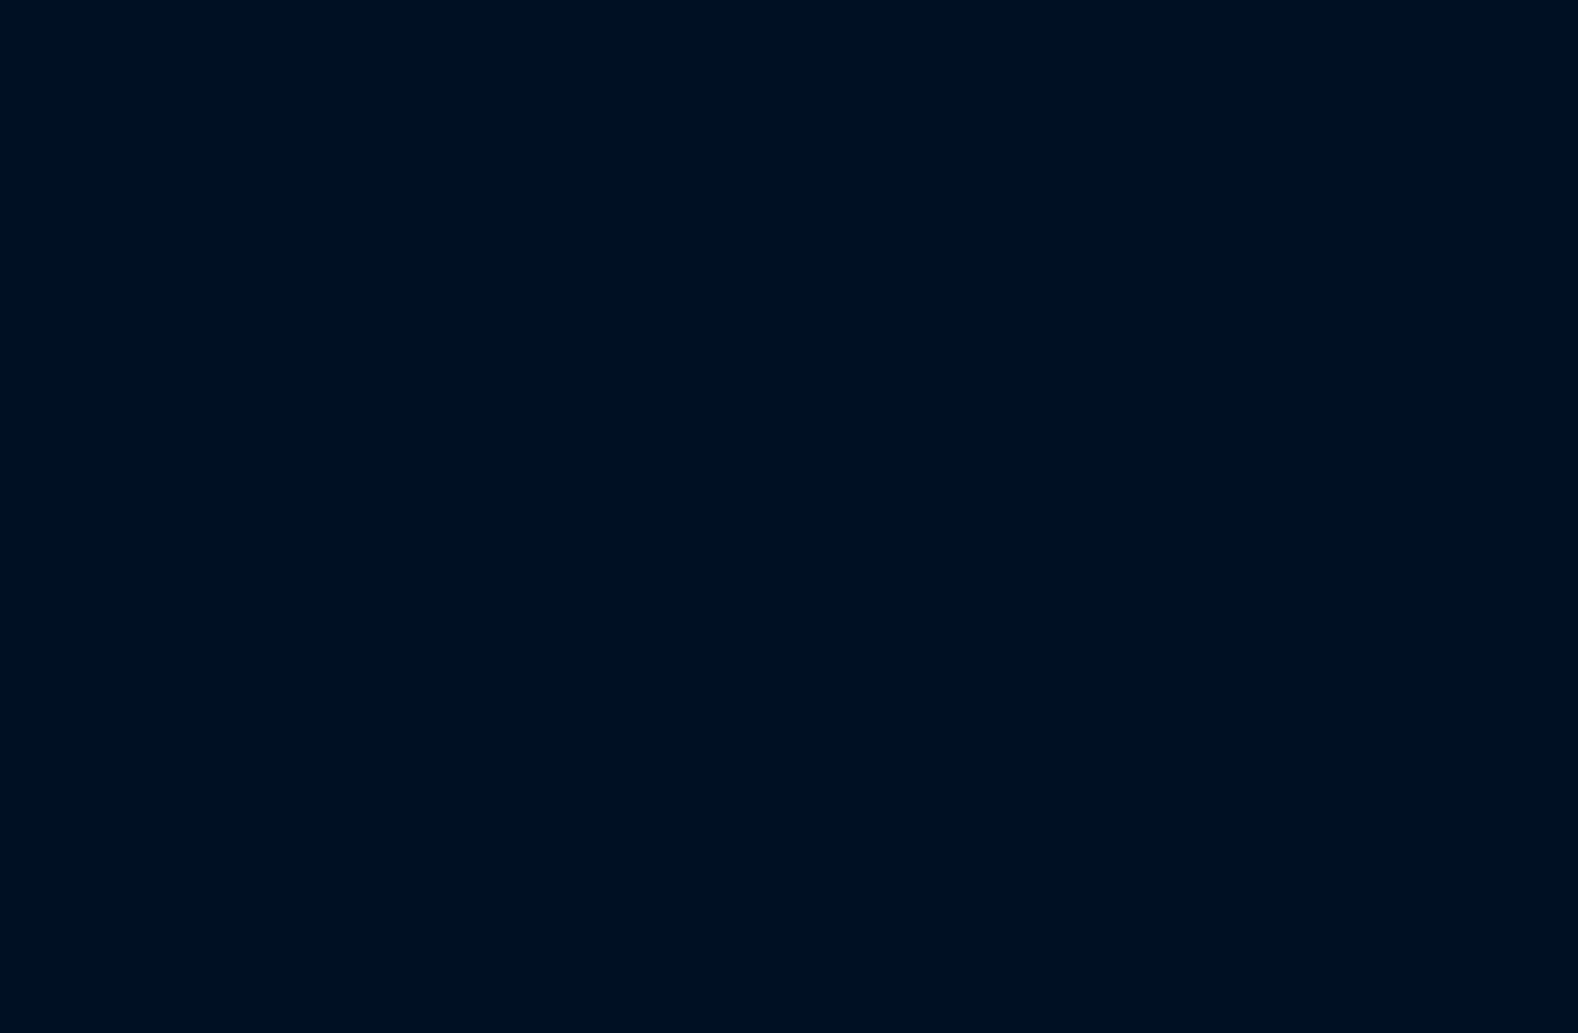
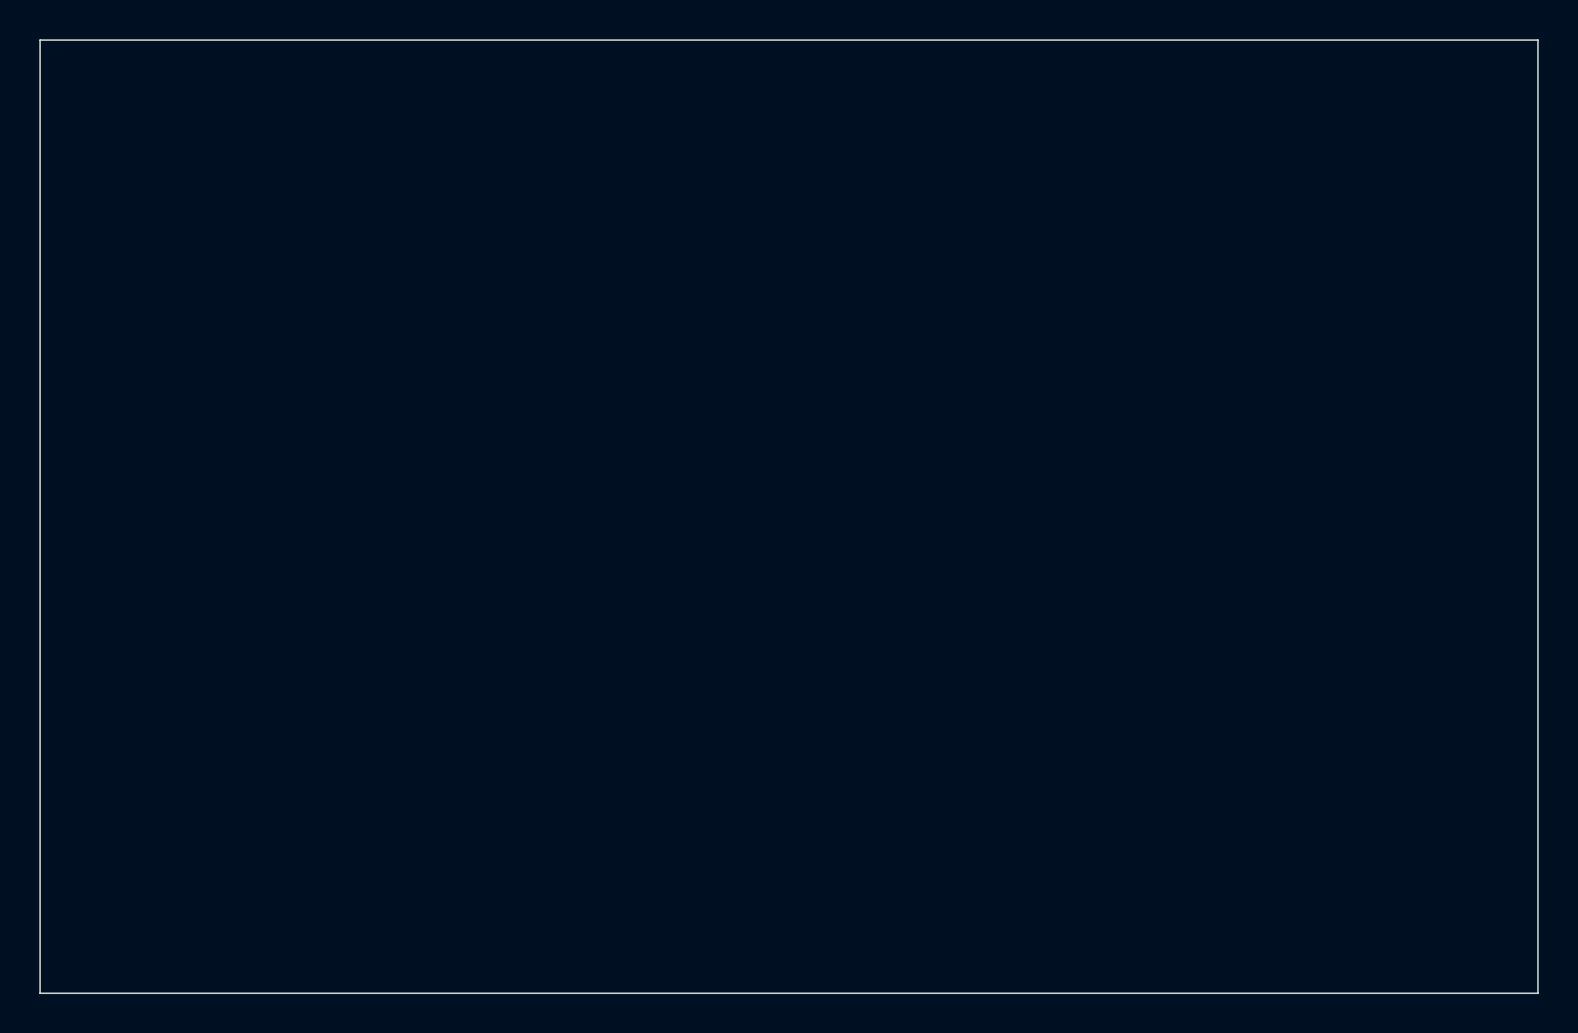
board edge: none -> (40, 40) (1537, 40) (1537, 993) (40, 993) (40, 40)

